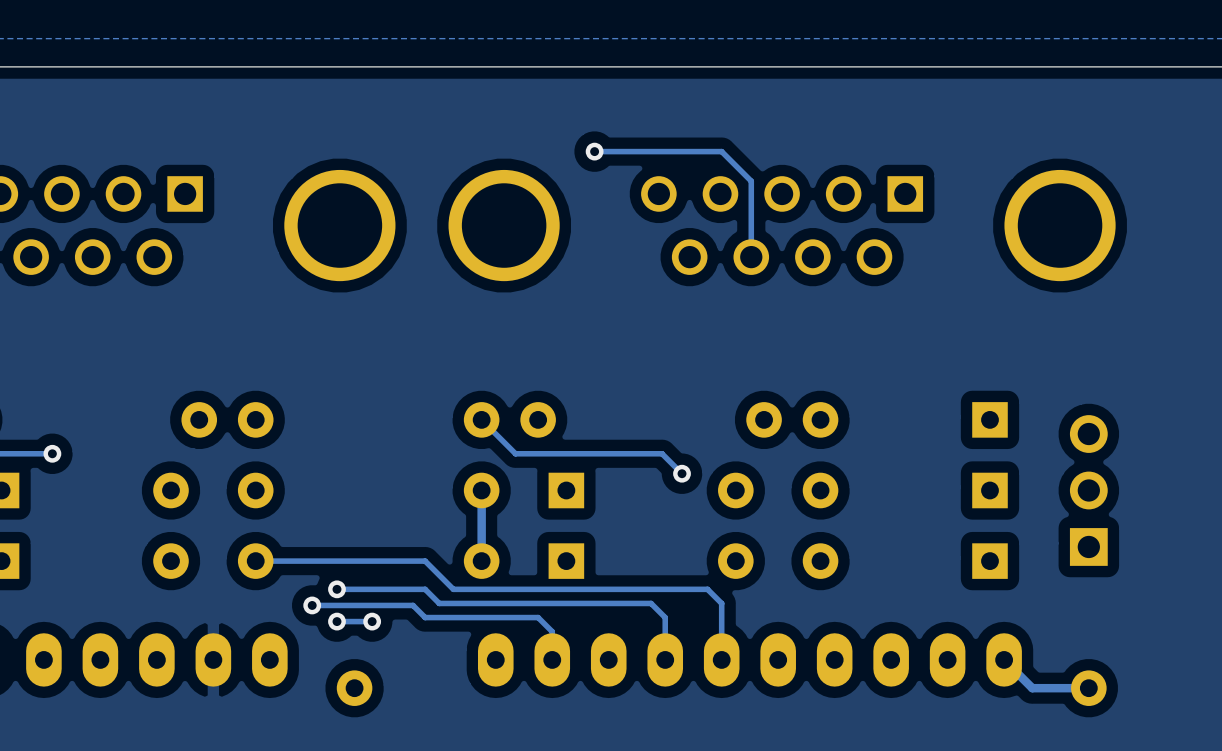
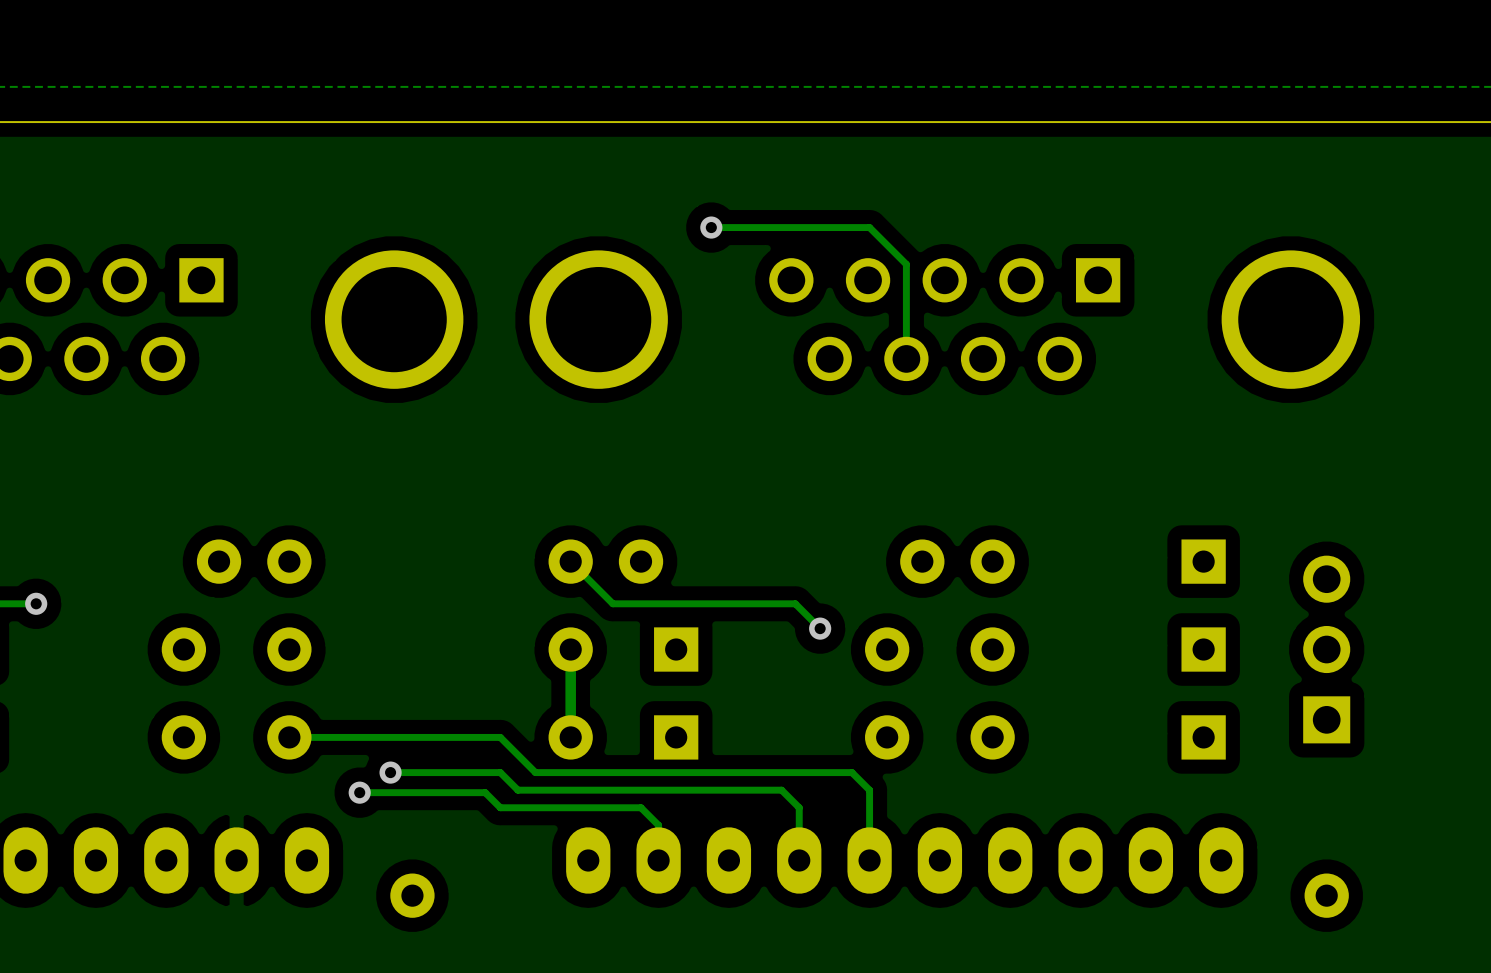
via: (336, 621) -> none
track: (372, 621) (336, 621) -> none
via: (372, 621) -> none
track: (1004, 659) (1032, 688) (1088, 688) -> none

